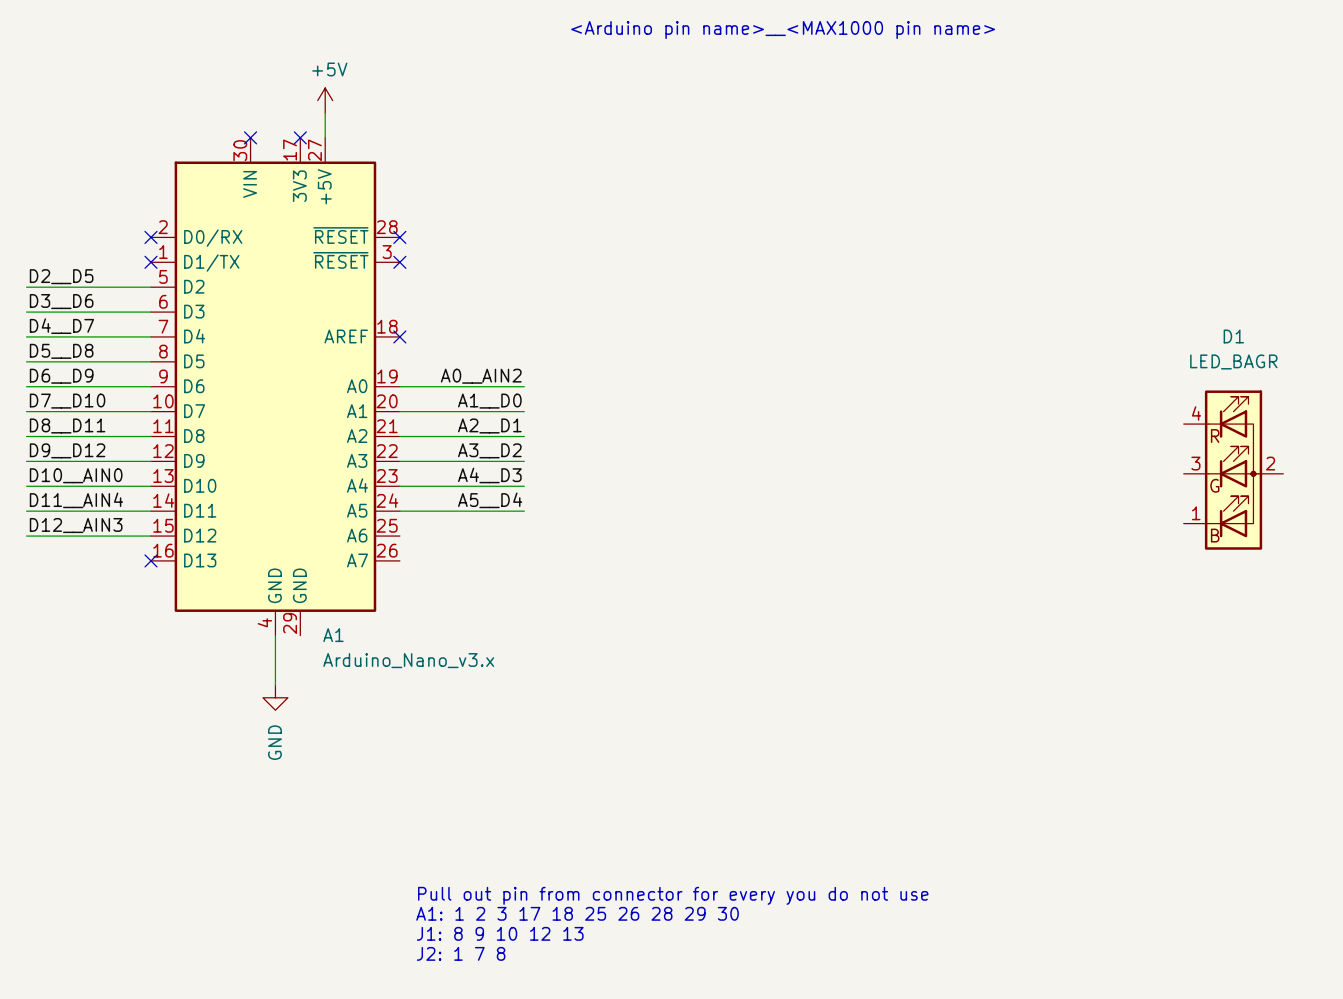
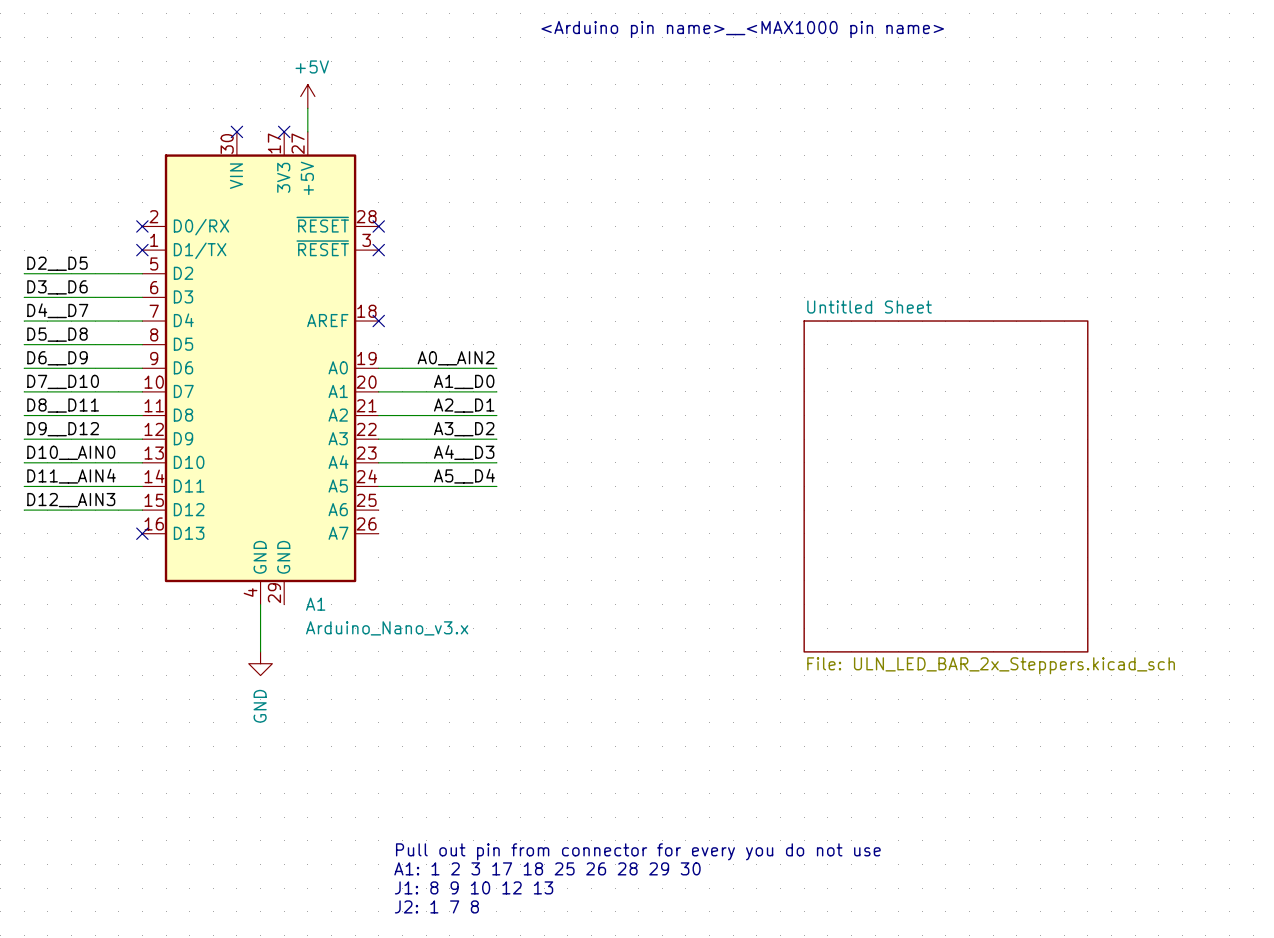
D1: LED_BAGR (1233, 470) -> none
sheet Untitled Sheet: none -> File: ULN_LED_BAR_2x_Steppers.kicad_sch (945, 486)

